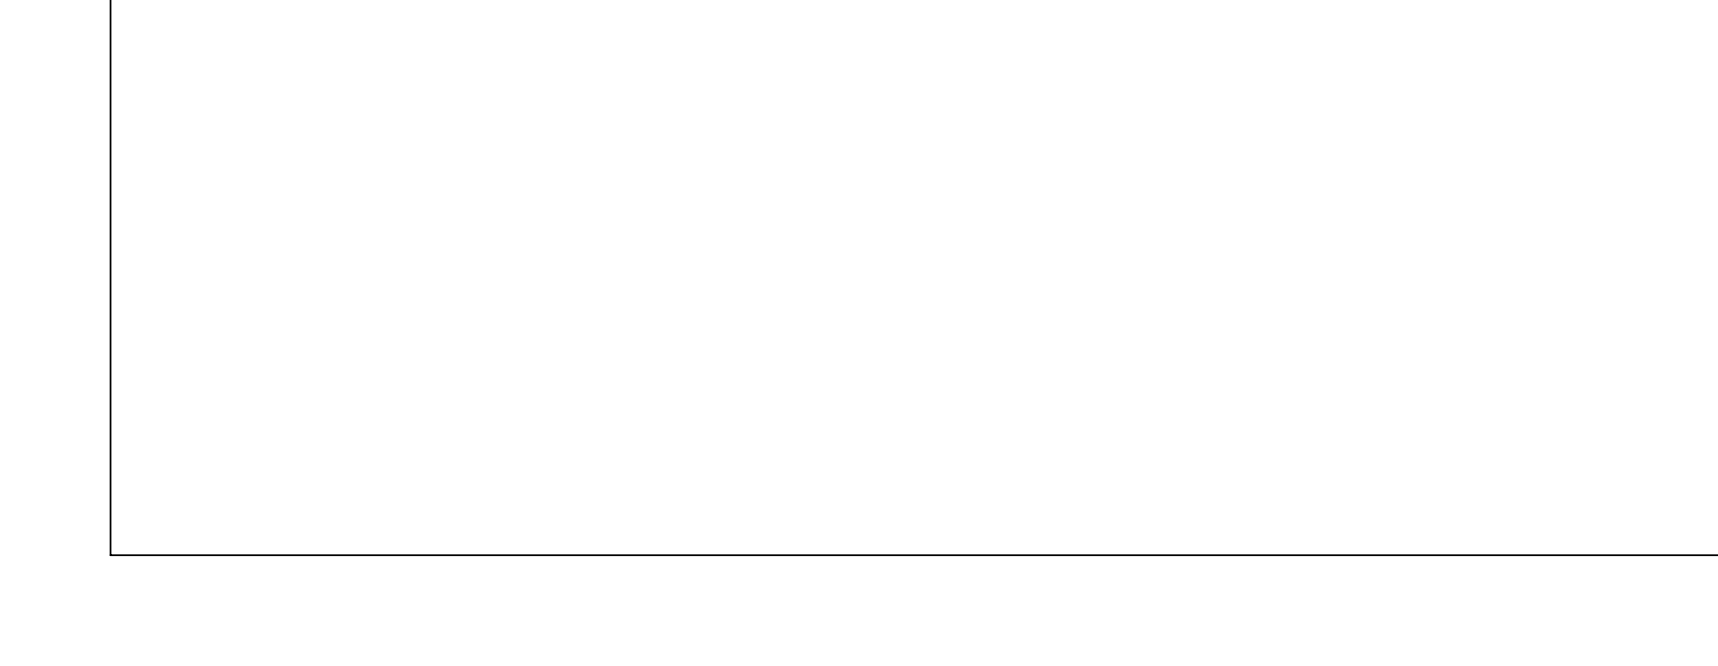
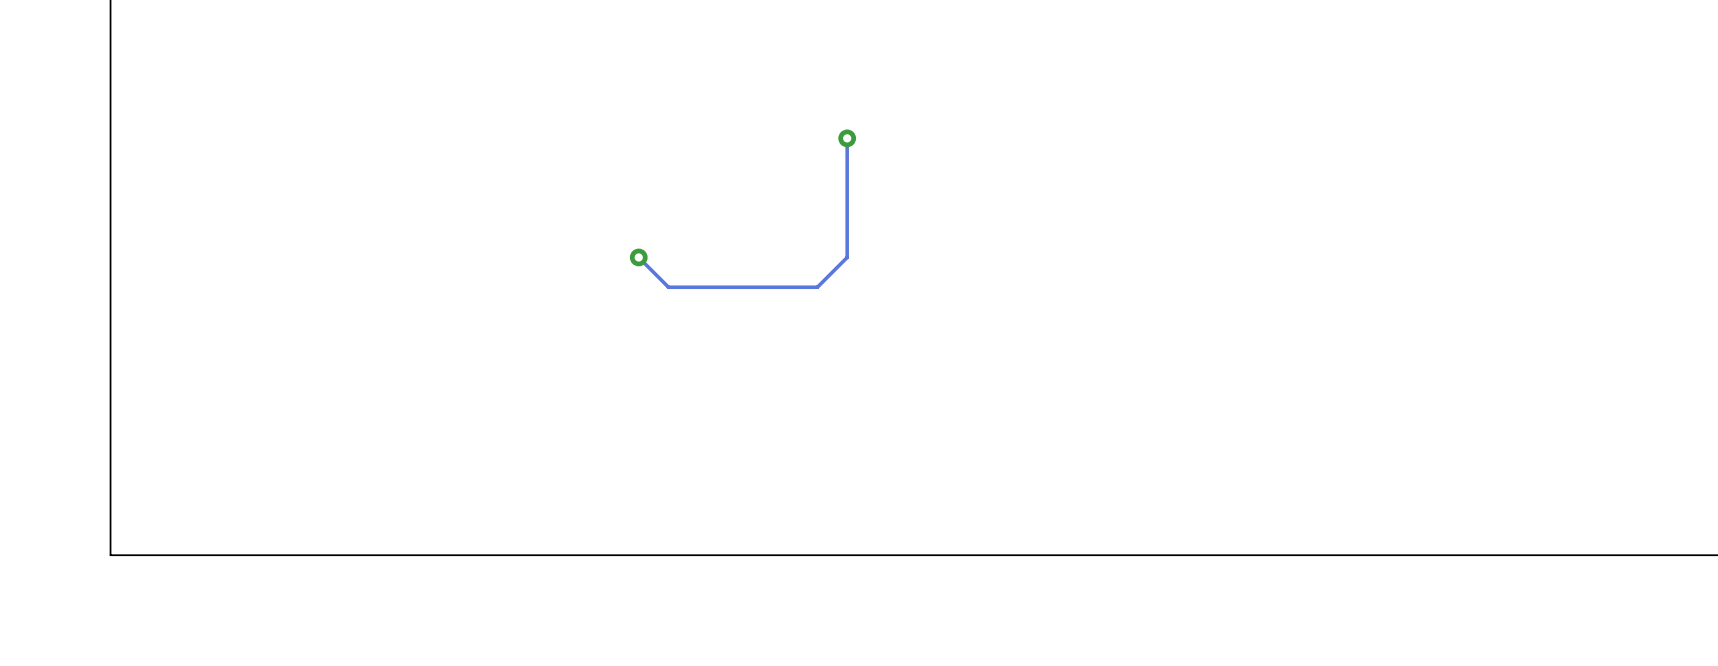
track: none -> (847, 138) (847, 257) (817, 287) (668, 287) (638, 257)
via: none -> (847, 138)
via: none -> (638, 257)

